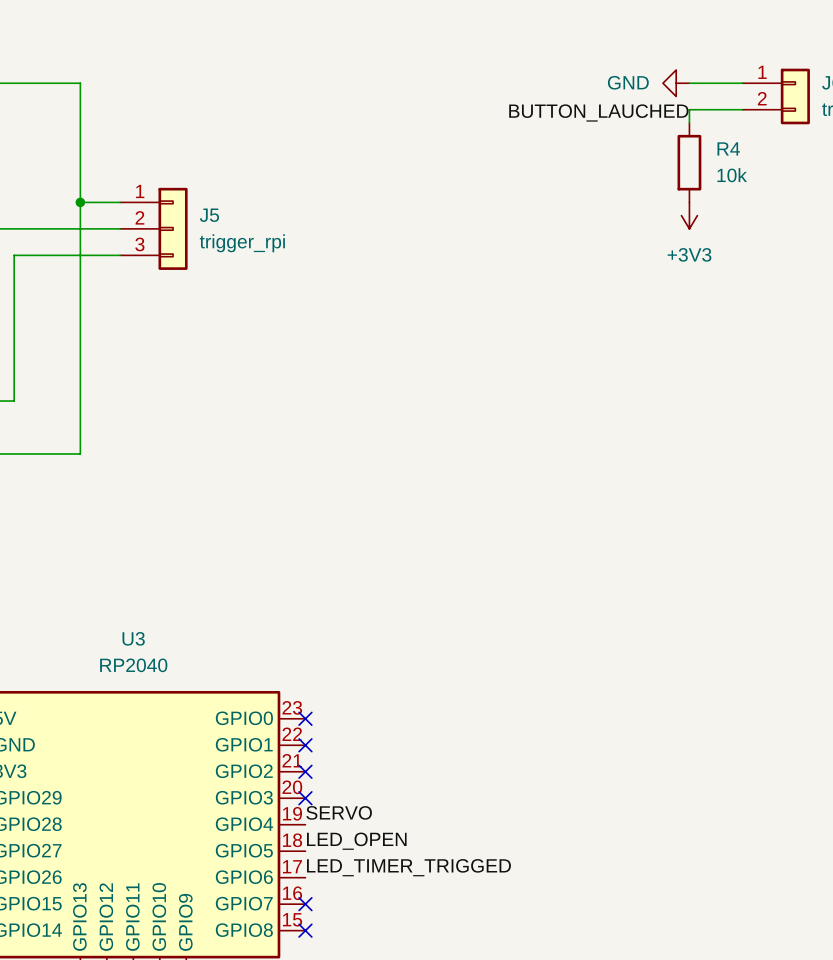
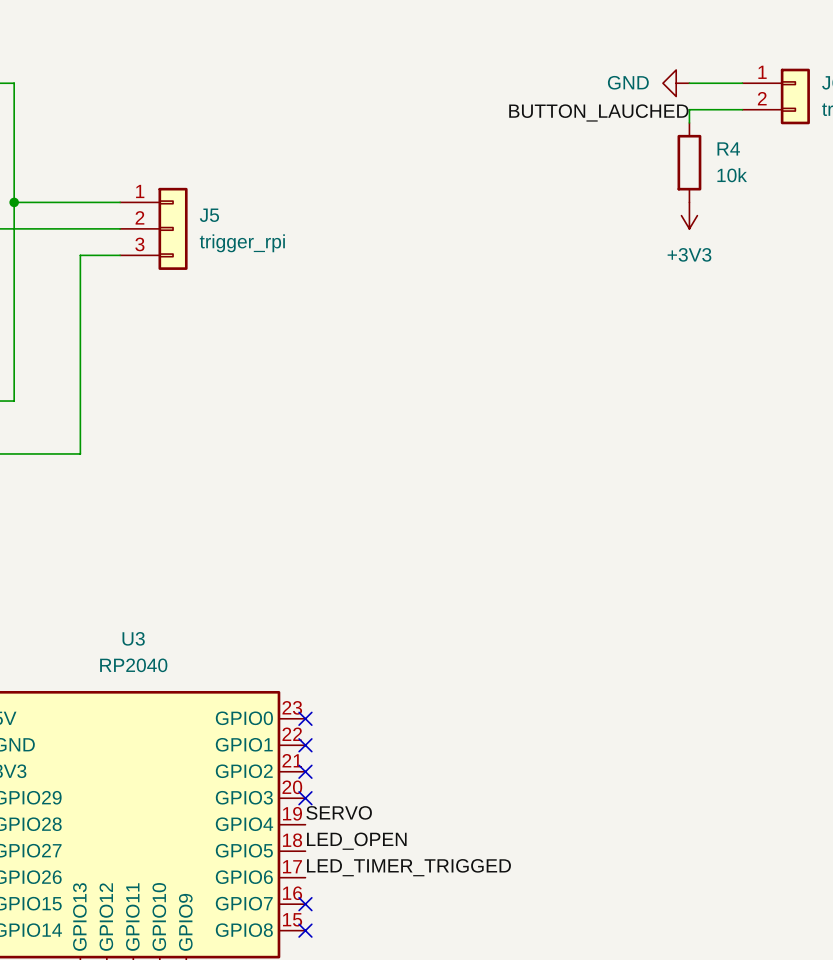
wire: (14, 83) (80, 83) (80, 255) (14, 255) -> (14, 83) (14, 255)
wire: none -> (14, 202) (80, 202)
junction: none -> (14, 202)
junction: (80, 202) -> none

